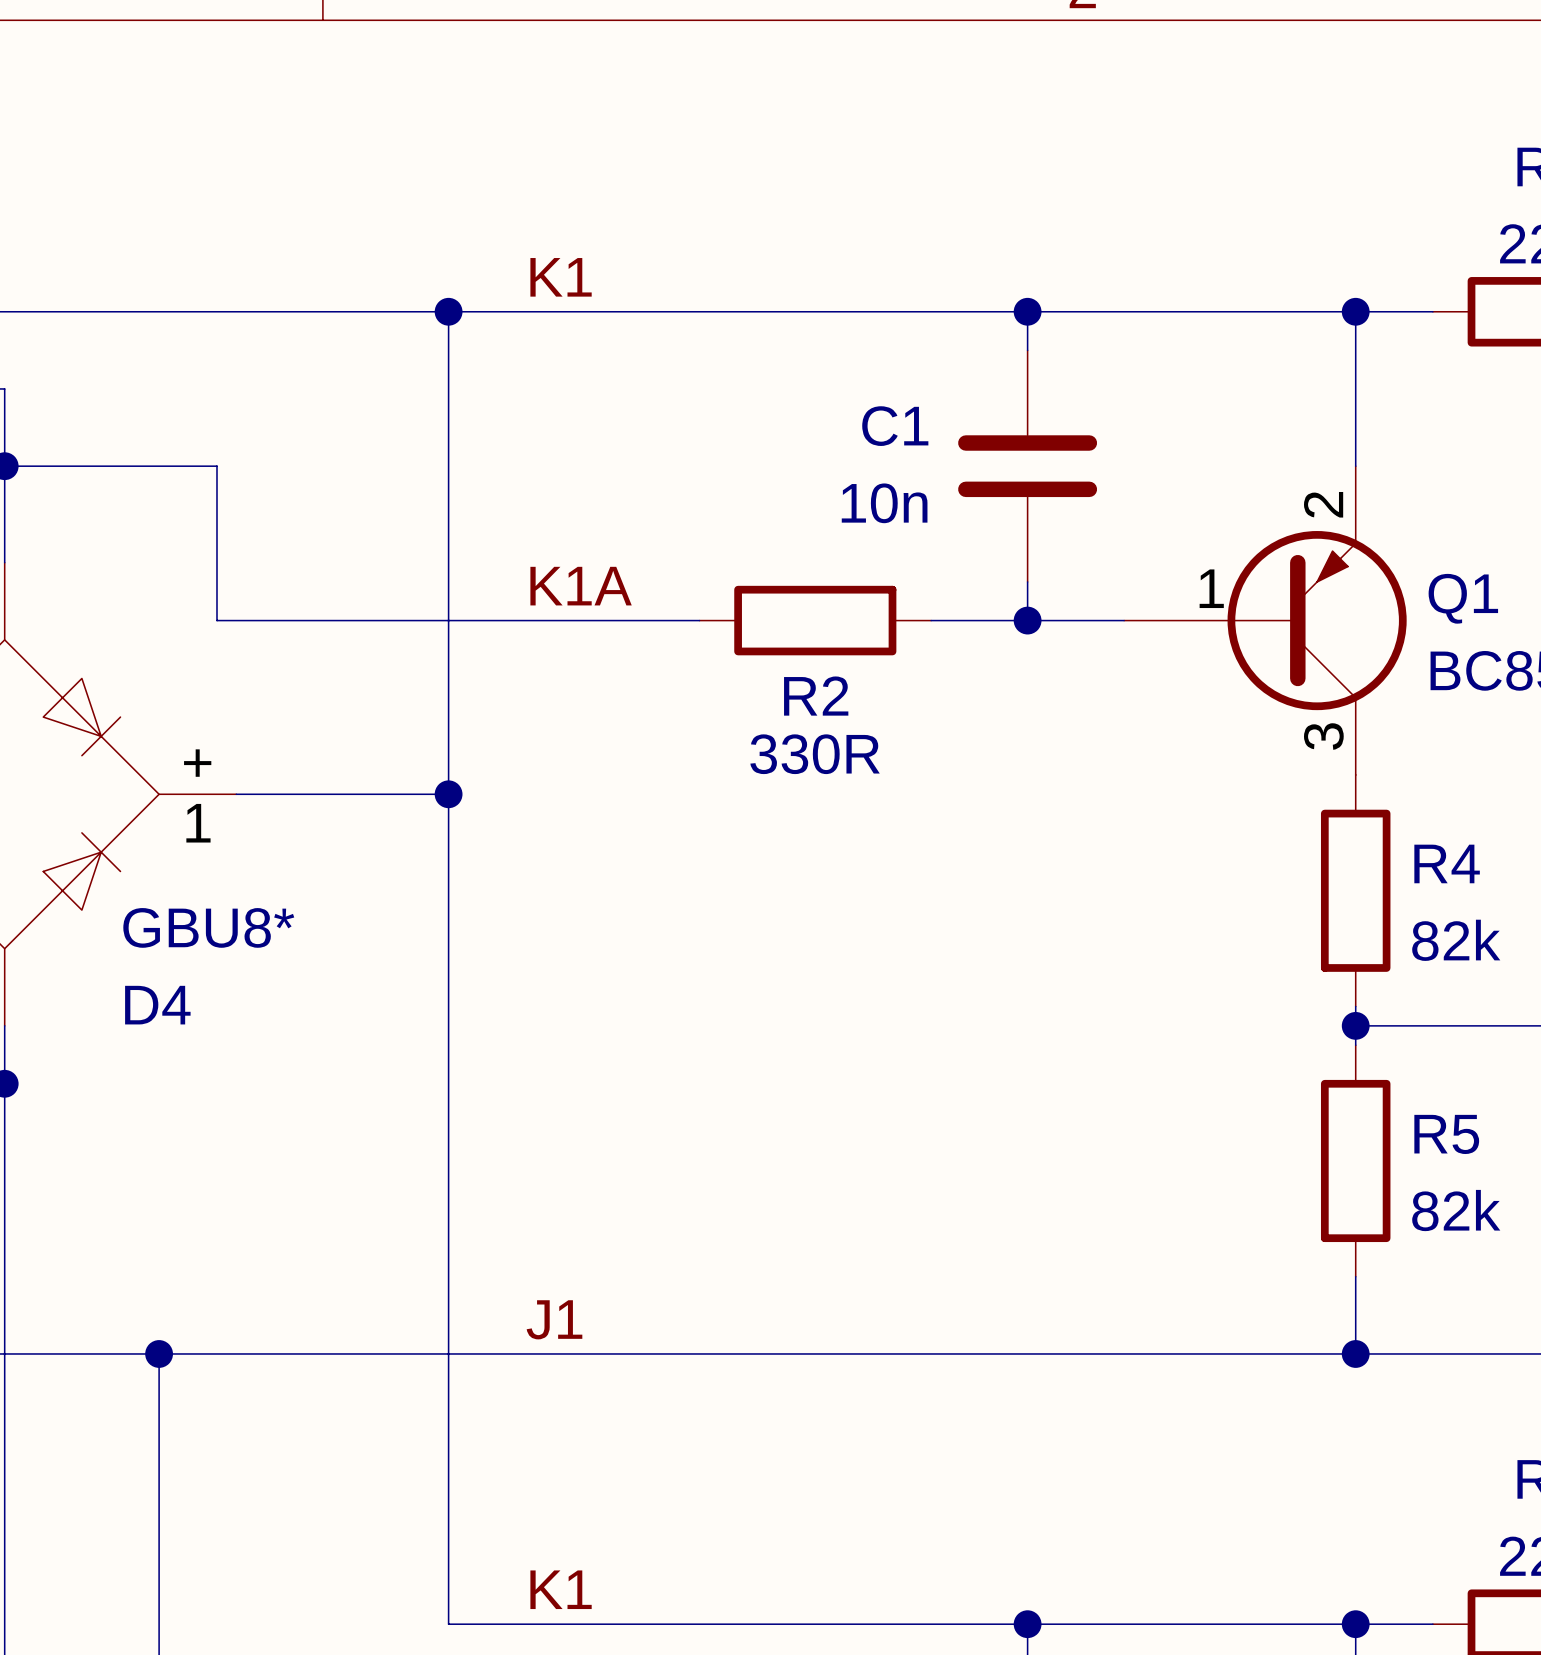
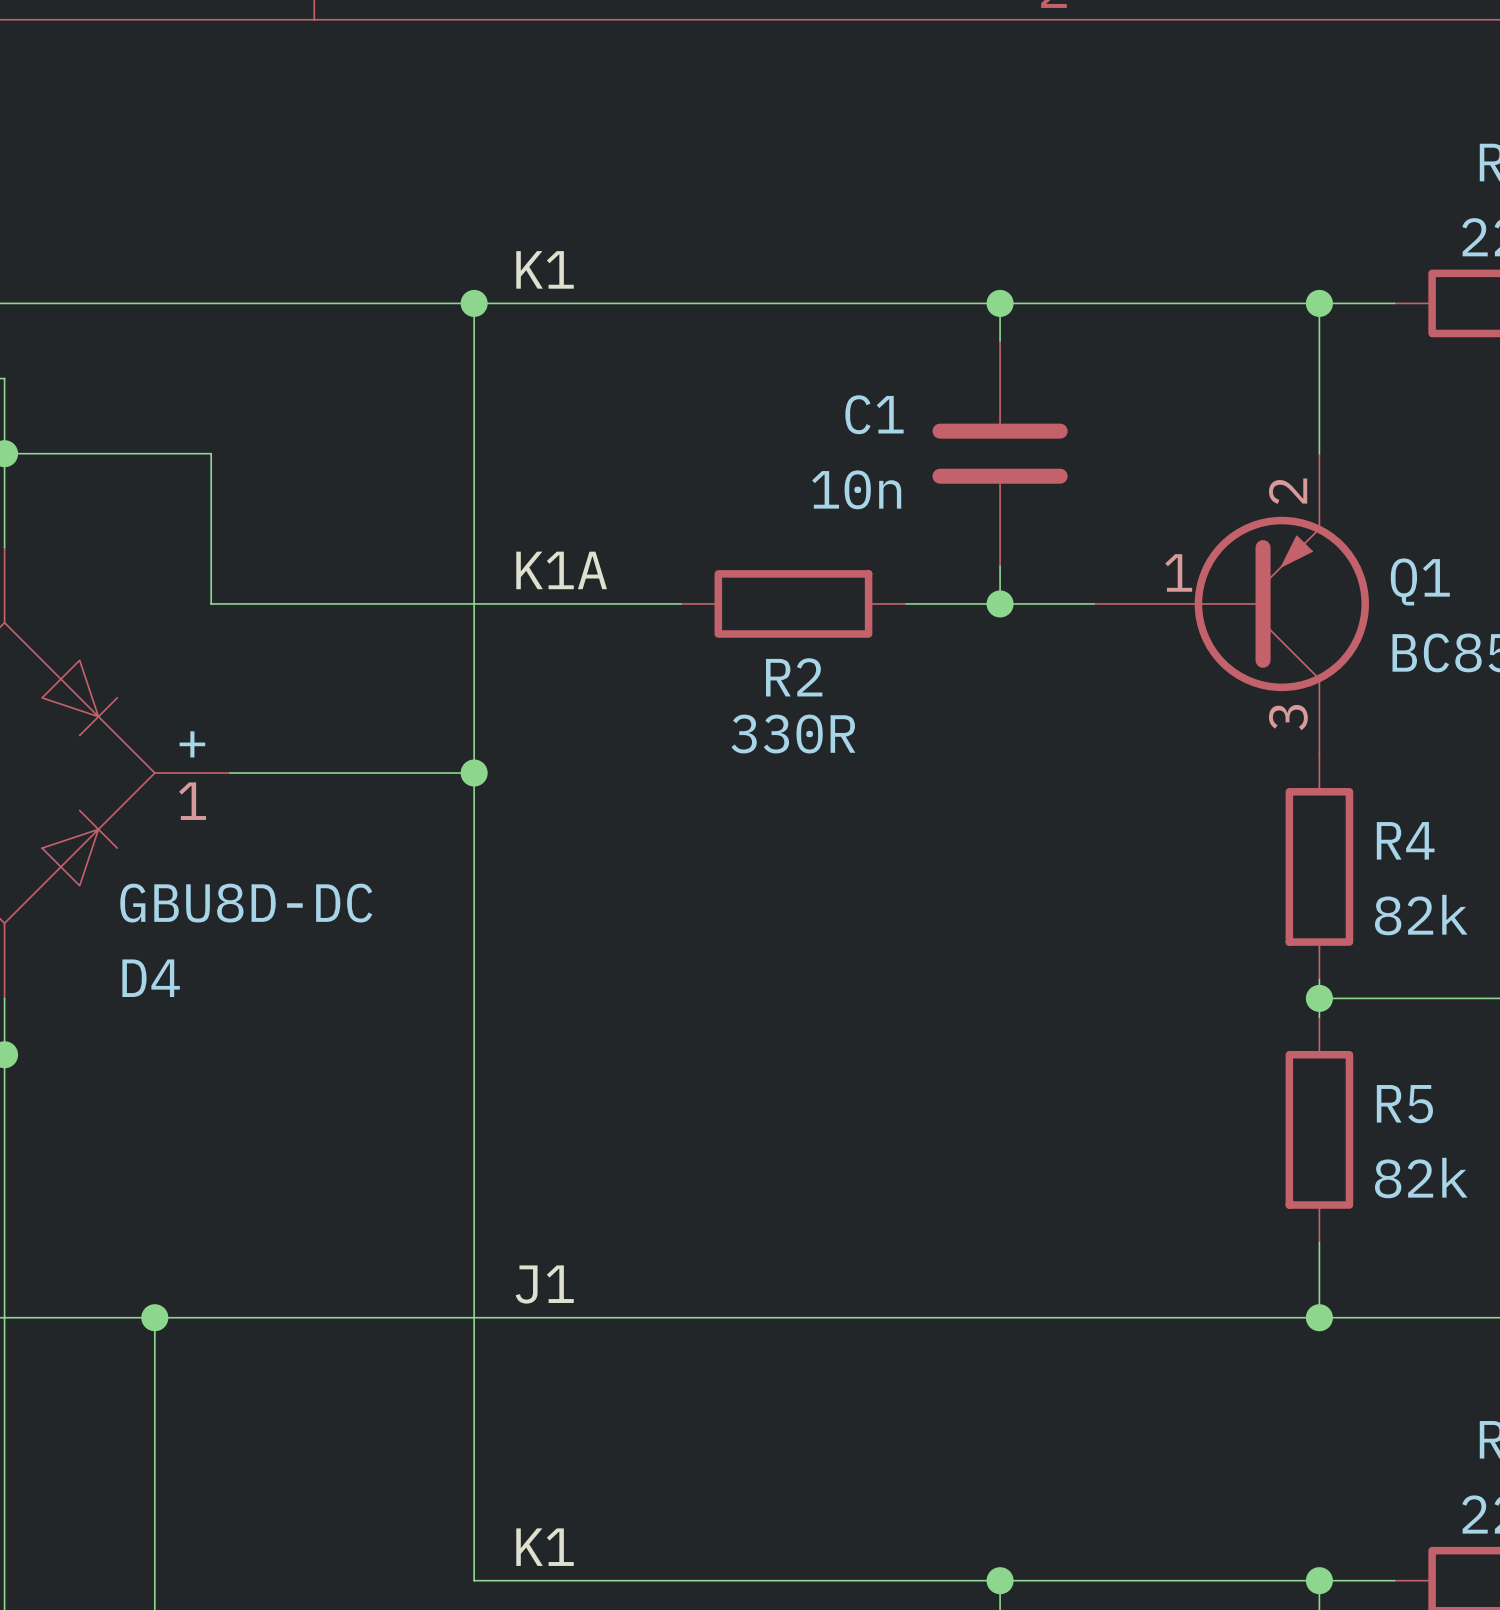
wire: (448, 311) (448, 1624) (487, 1624) -> (474, 303) (474, 1580)
junction position: (448, 311) -> (474, 303)
wire: none -> (436, 773) (474, 773)
junction position: (448, 794) -> (474, 773)
D4 value: GBU8* (208, 927) -> GBU8D-DC (246, 903)

